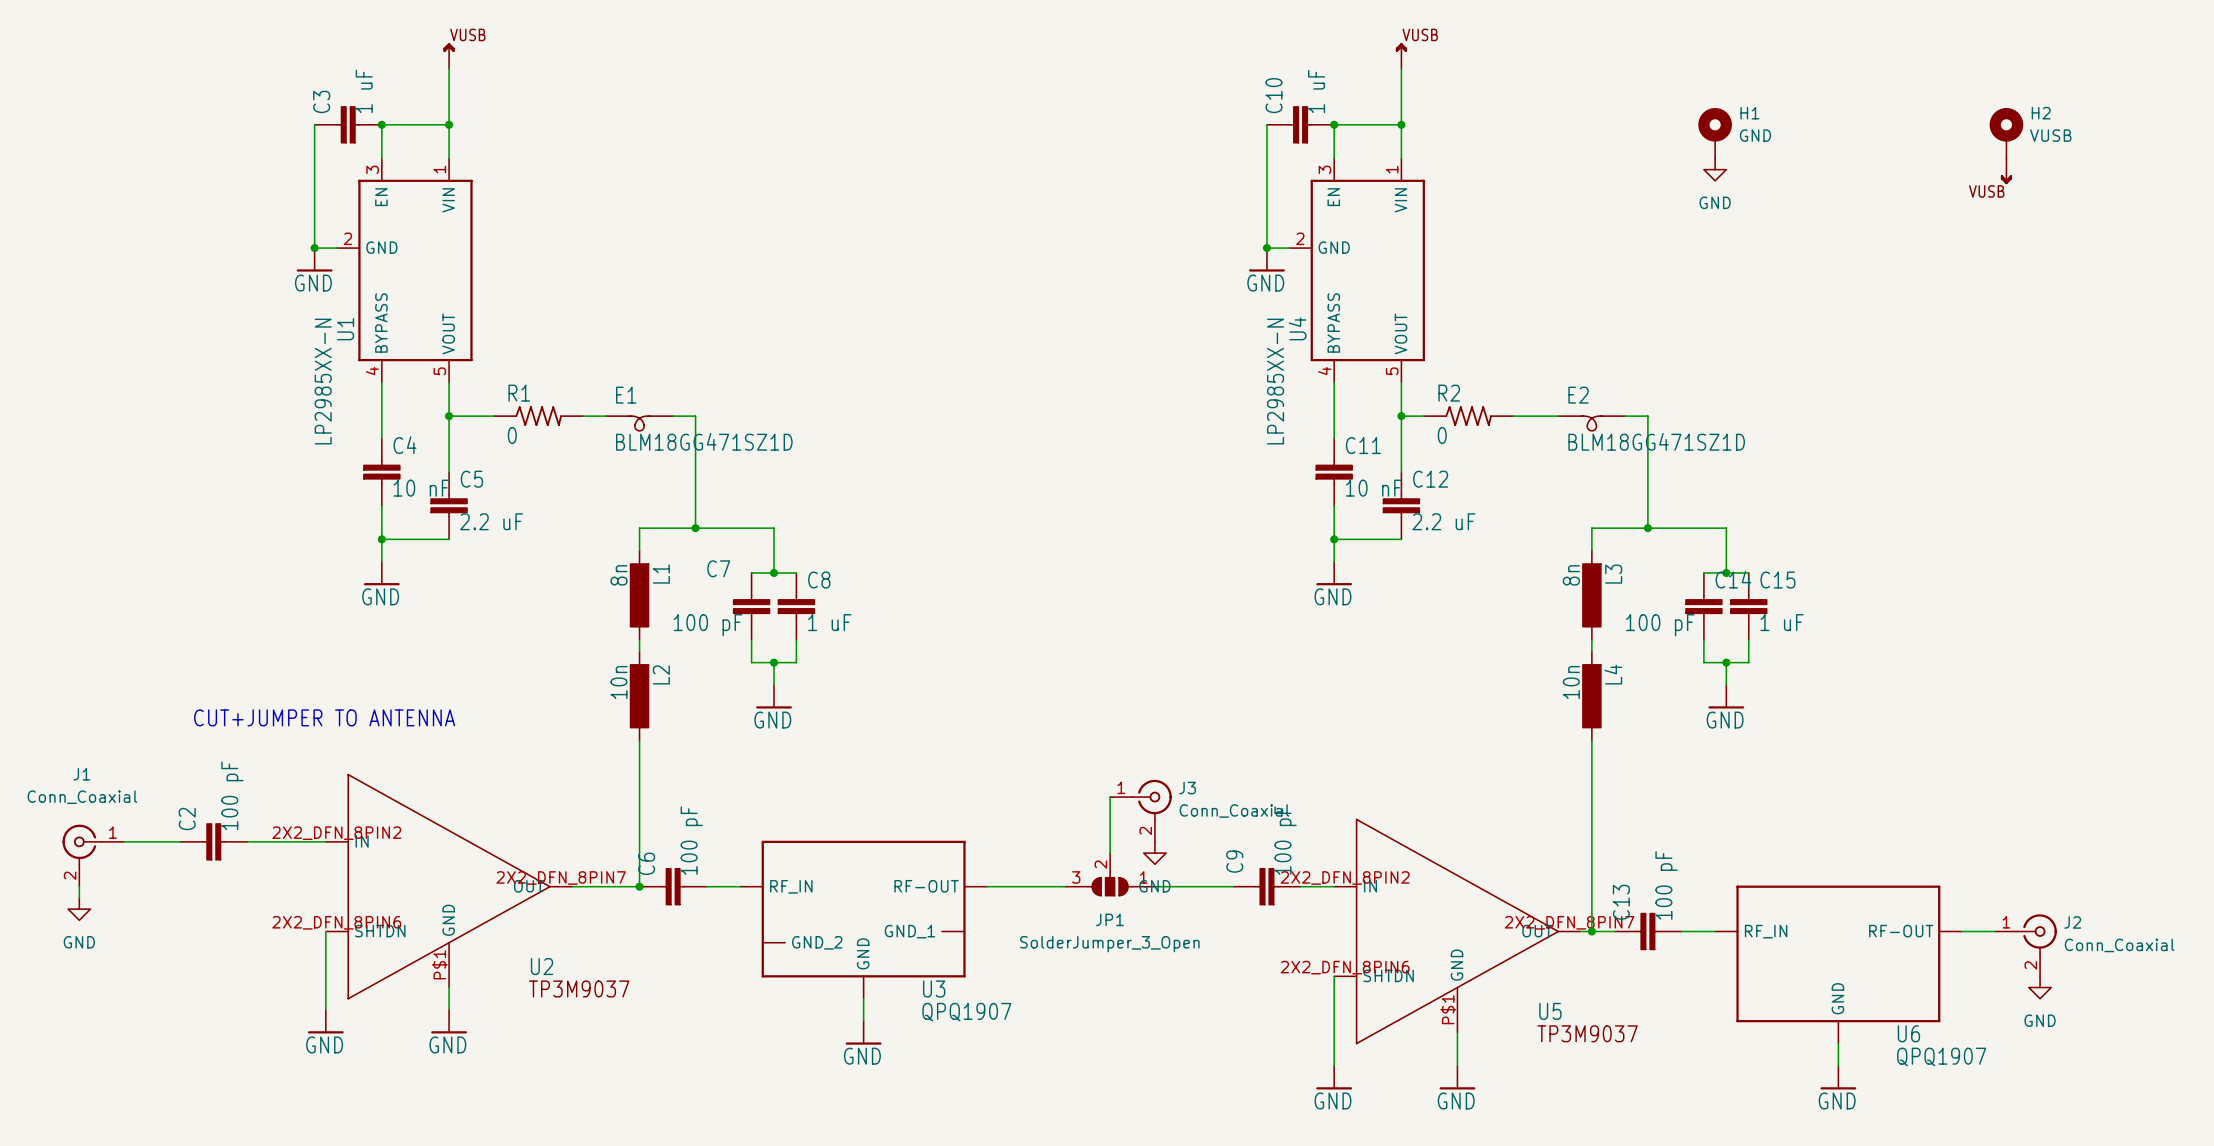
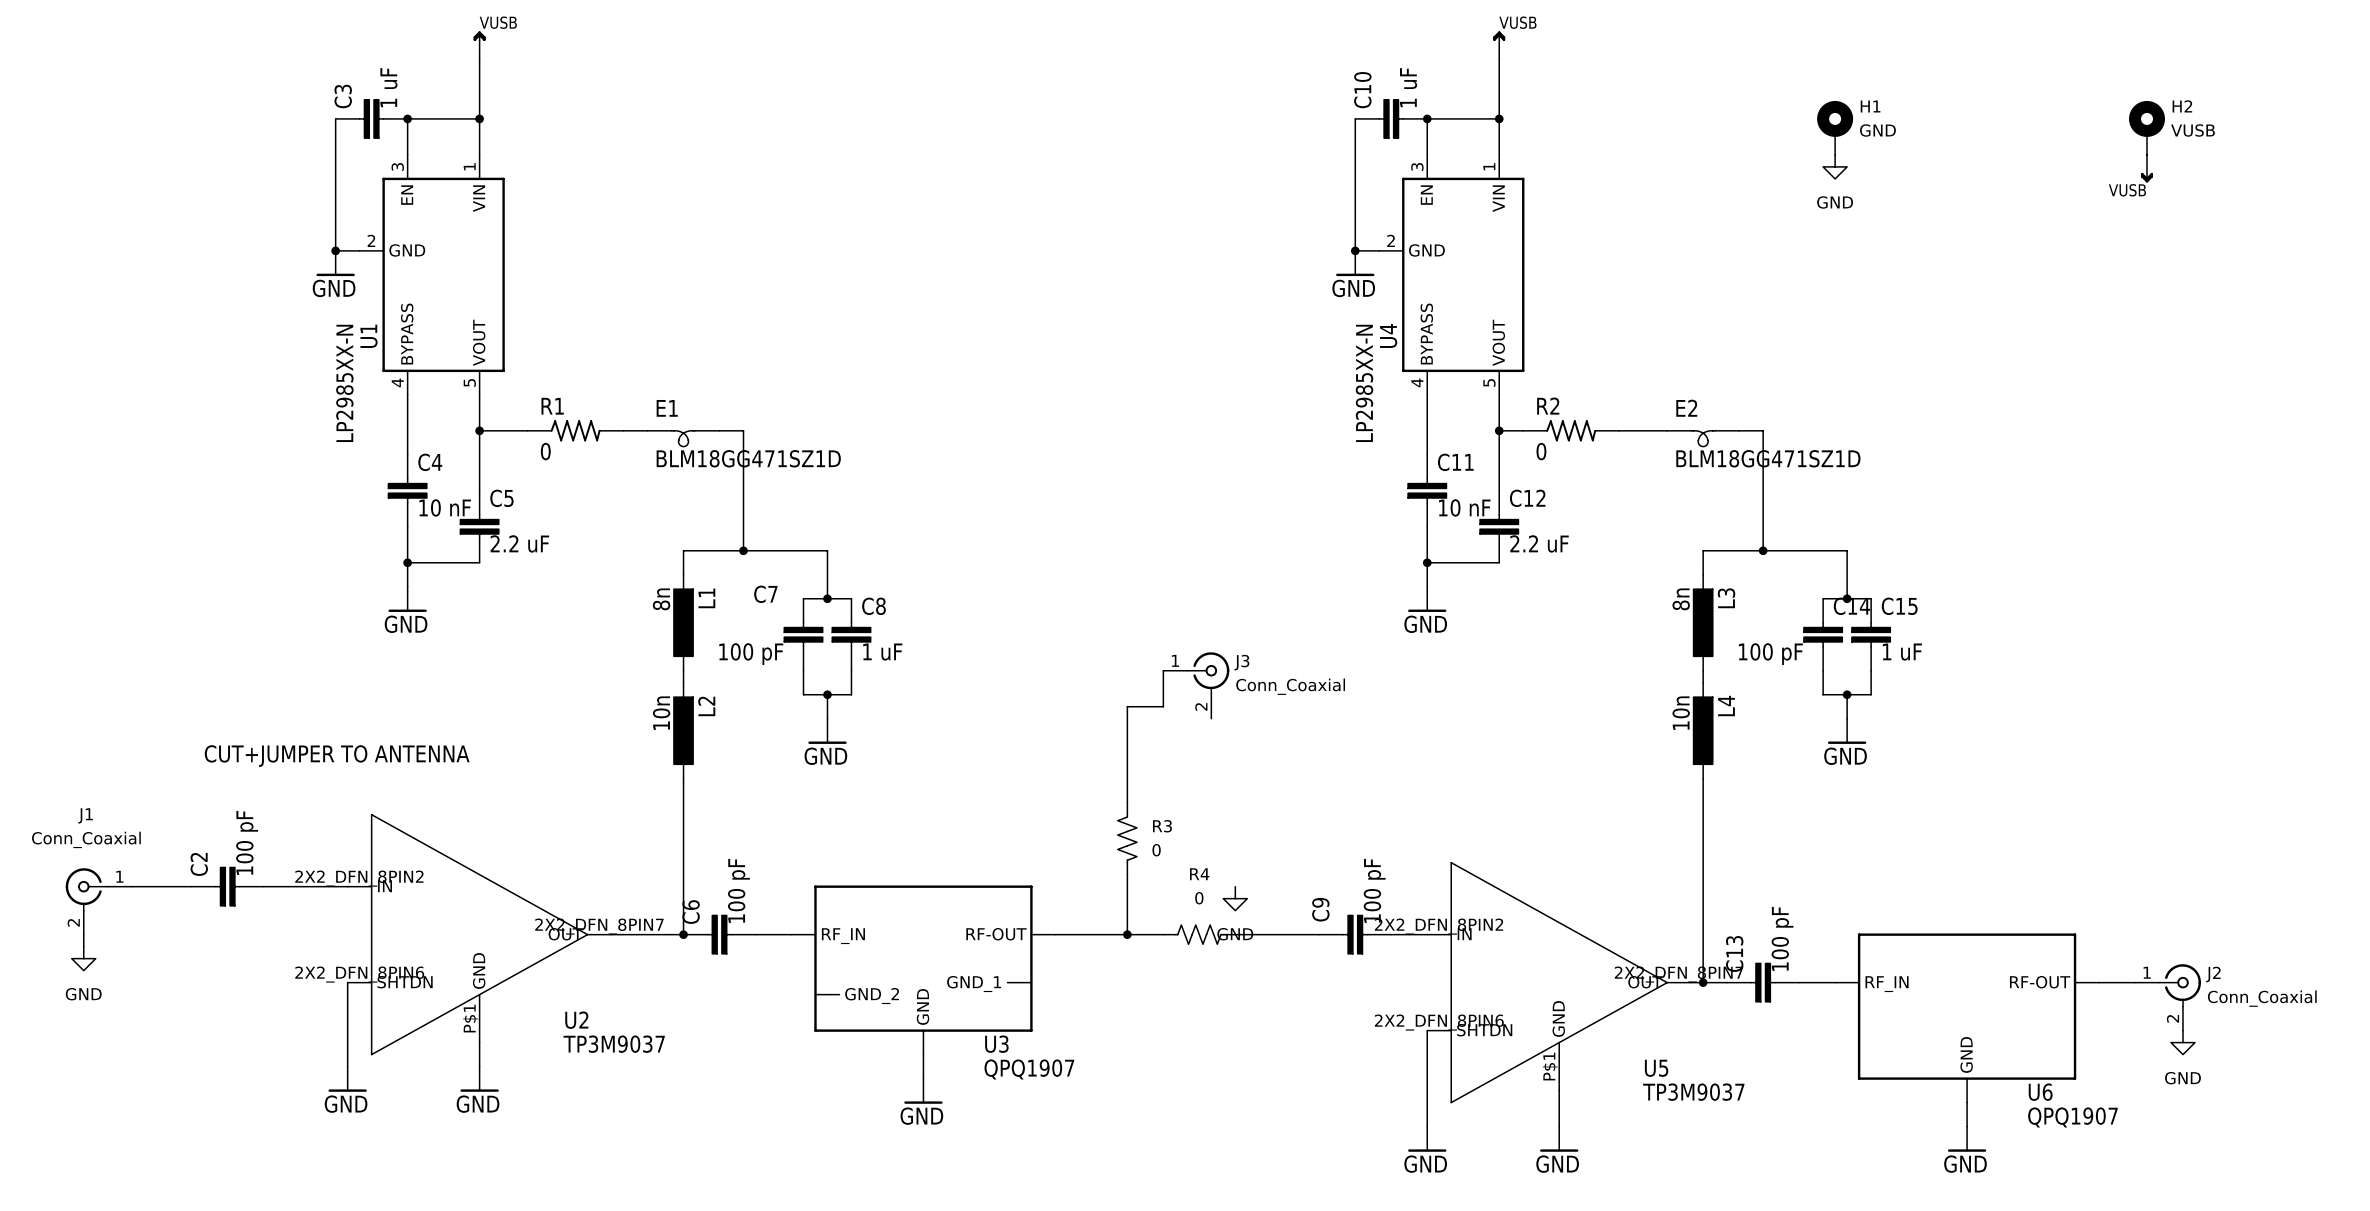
wire: none -> (1163, 670) (1163, 706) (1127, 706) (1127, 802)
R3: none -> 0 (1127, 838)
wire: (1110, 797) (1110, 853) -> (1127, 874) (1127, 934)
J3 position: (1140, 810) -> (1196, 685)
JP1: SolderJumper_3_Open (1110, 874) -> none
junction: none -> (1127, 934)
R4: none -> 0 (1199, 934)

